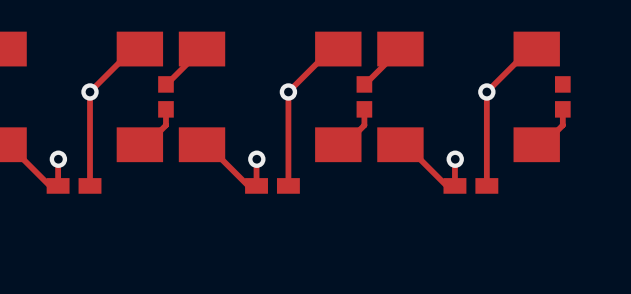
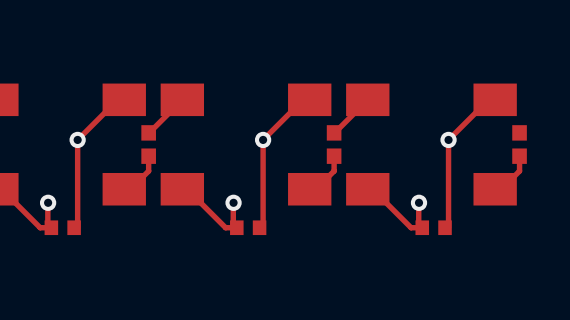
part footprint: [46, 178, 102, 194] -> [44, 220, 81, 236]
part footprint: [245, 178, 300, 194] -> [230, 220, 267, 236]
part footprint: [443, 178, 499, 194] -> [415, 220, 452, 236]

